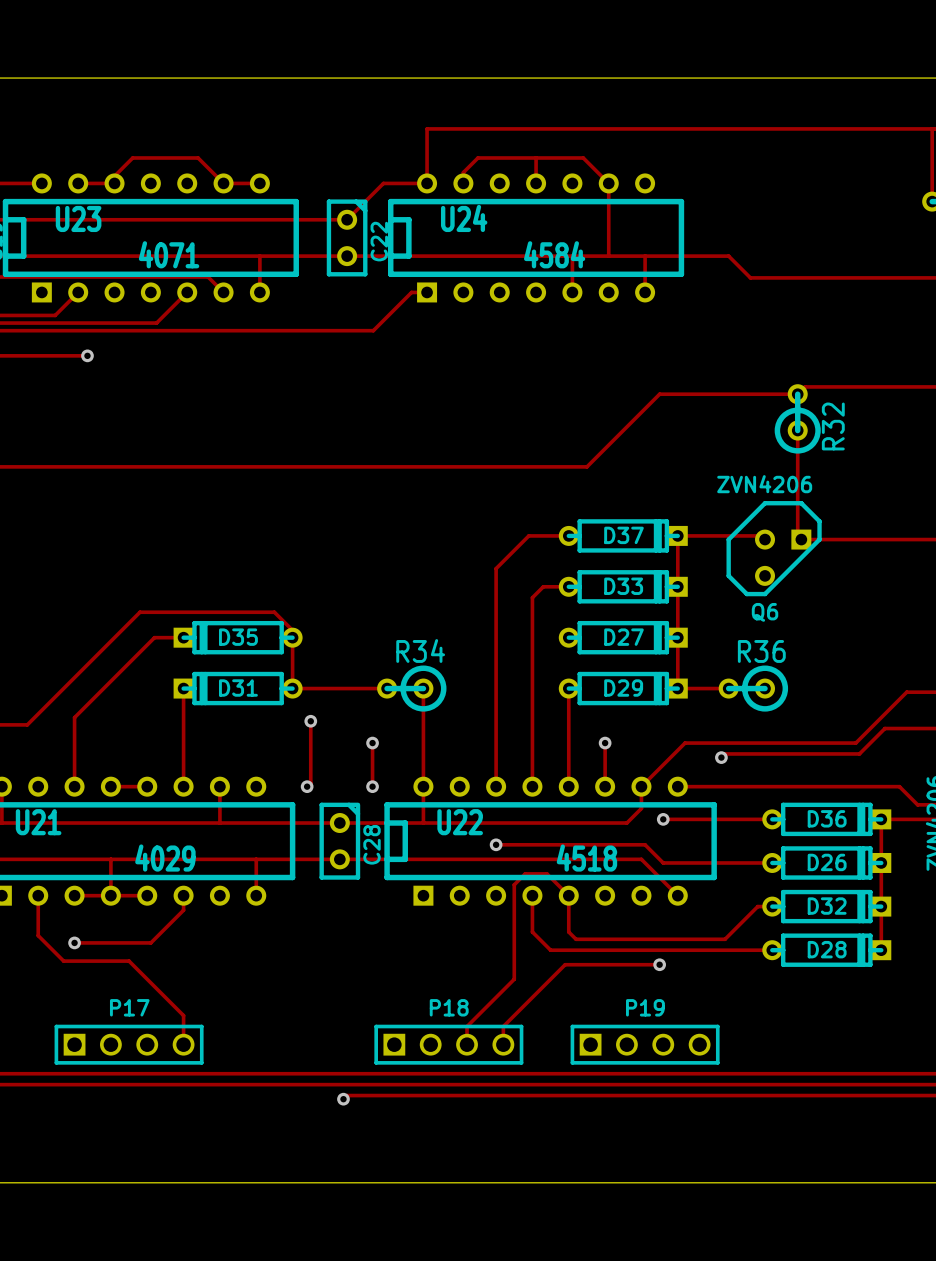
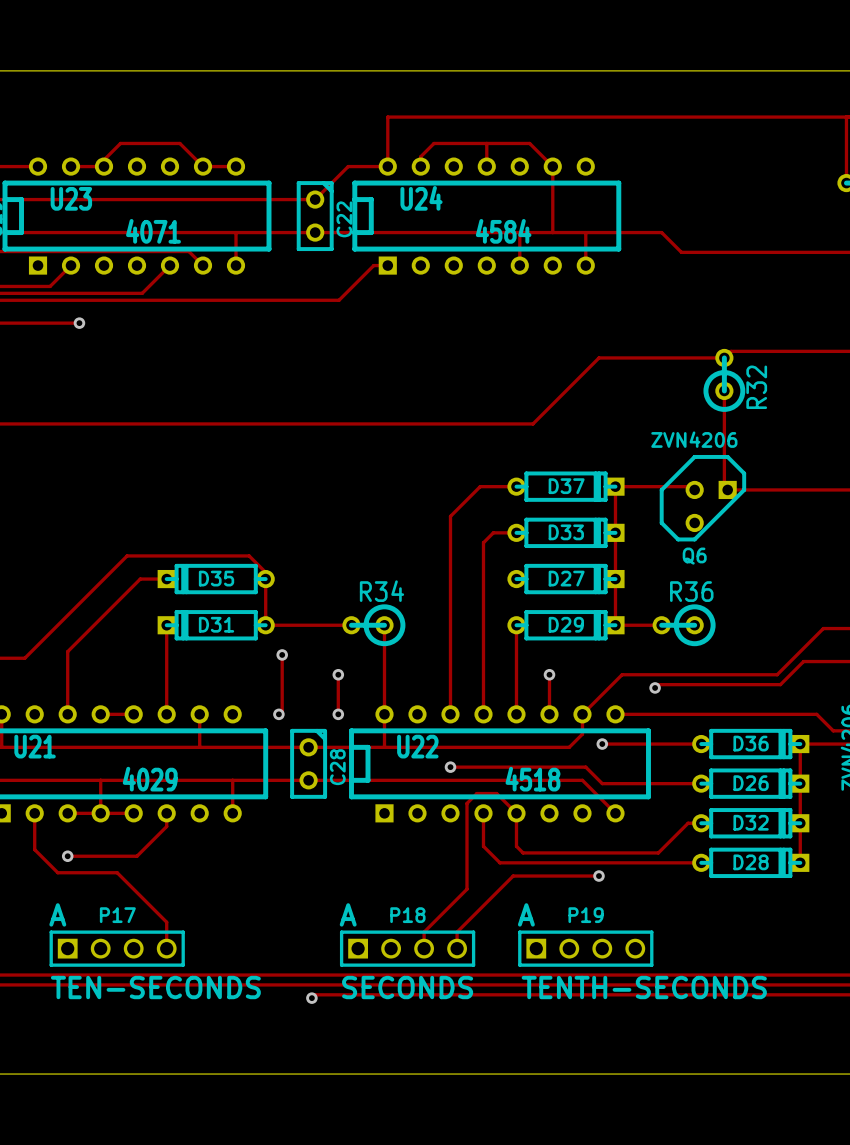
text: none -> A (57, 914)
text: none -> A (348, 914)
text: none -> A (526, 914)
text: none -> TEN-SECONDS (155, 987)
text: none -> SECONDS (407, 987)
text: none -> TENTH-SECONDS (644, 987)

